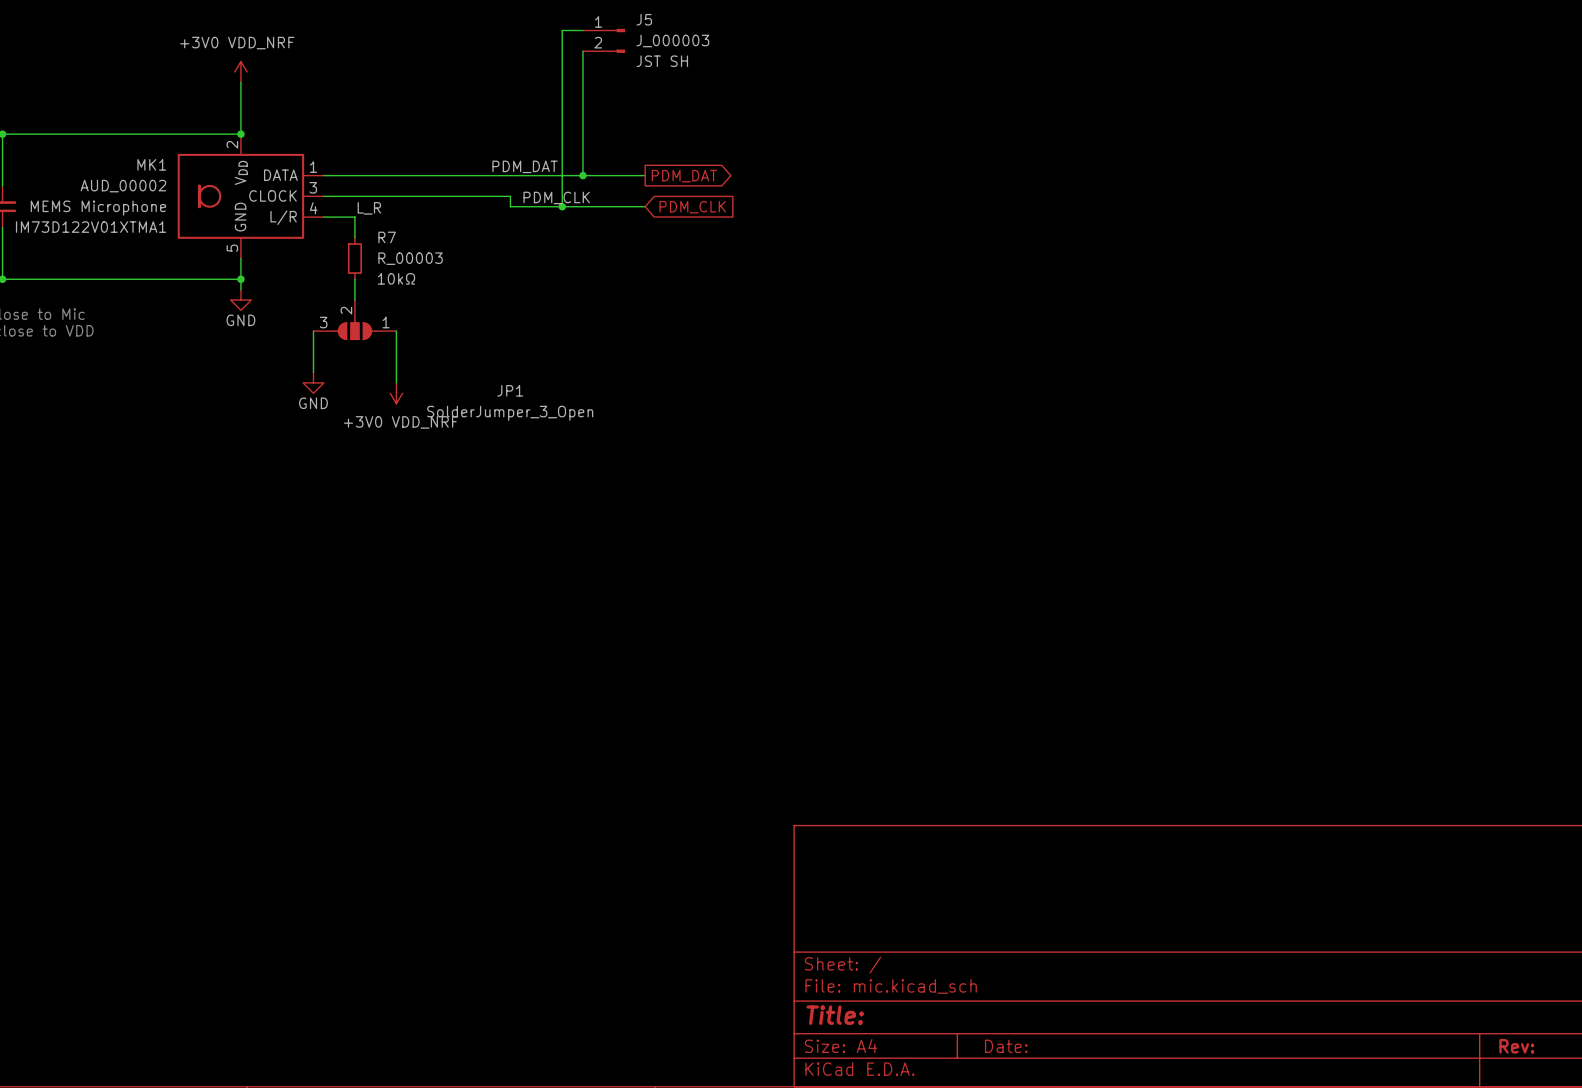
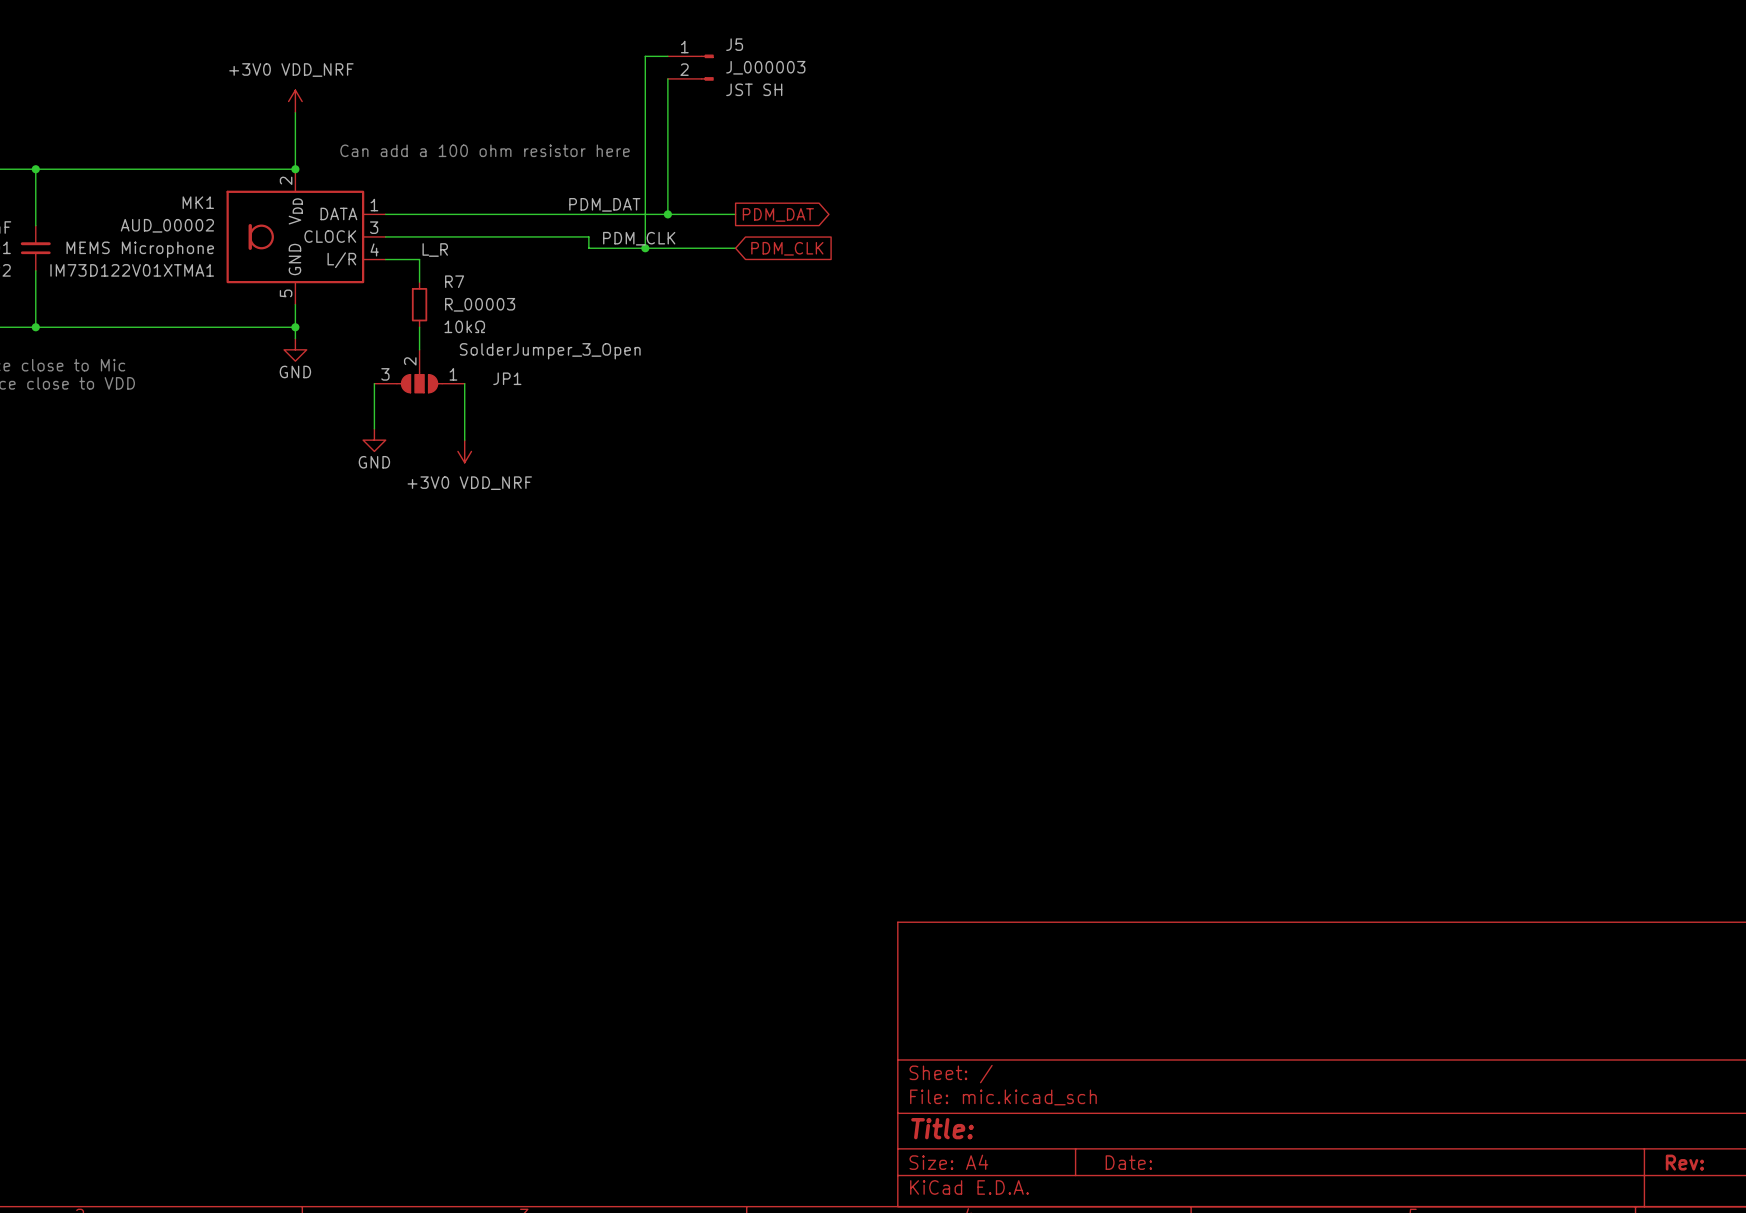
text: none -> Can add a 100 ohm resistor here (485, 150)
JP1 name position: JP1 (510, 390) -> JP1 (507, 378)
JP1 value position: SolderJumper_3_Open (510, 413) -> SolderJumper_3_Open (550, 351)

